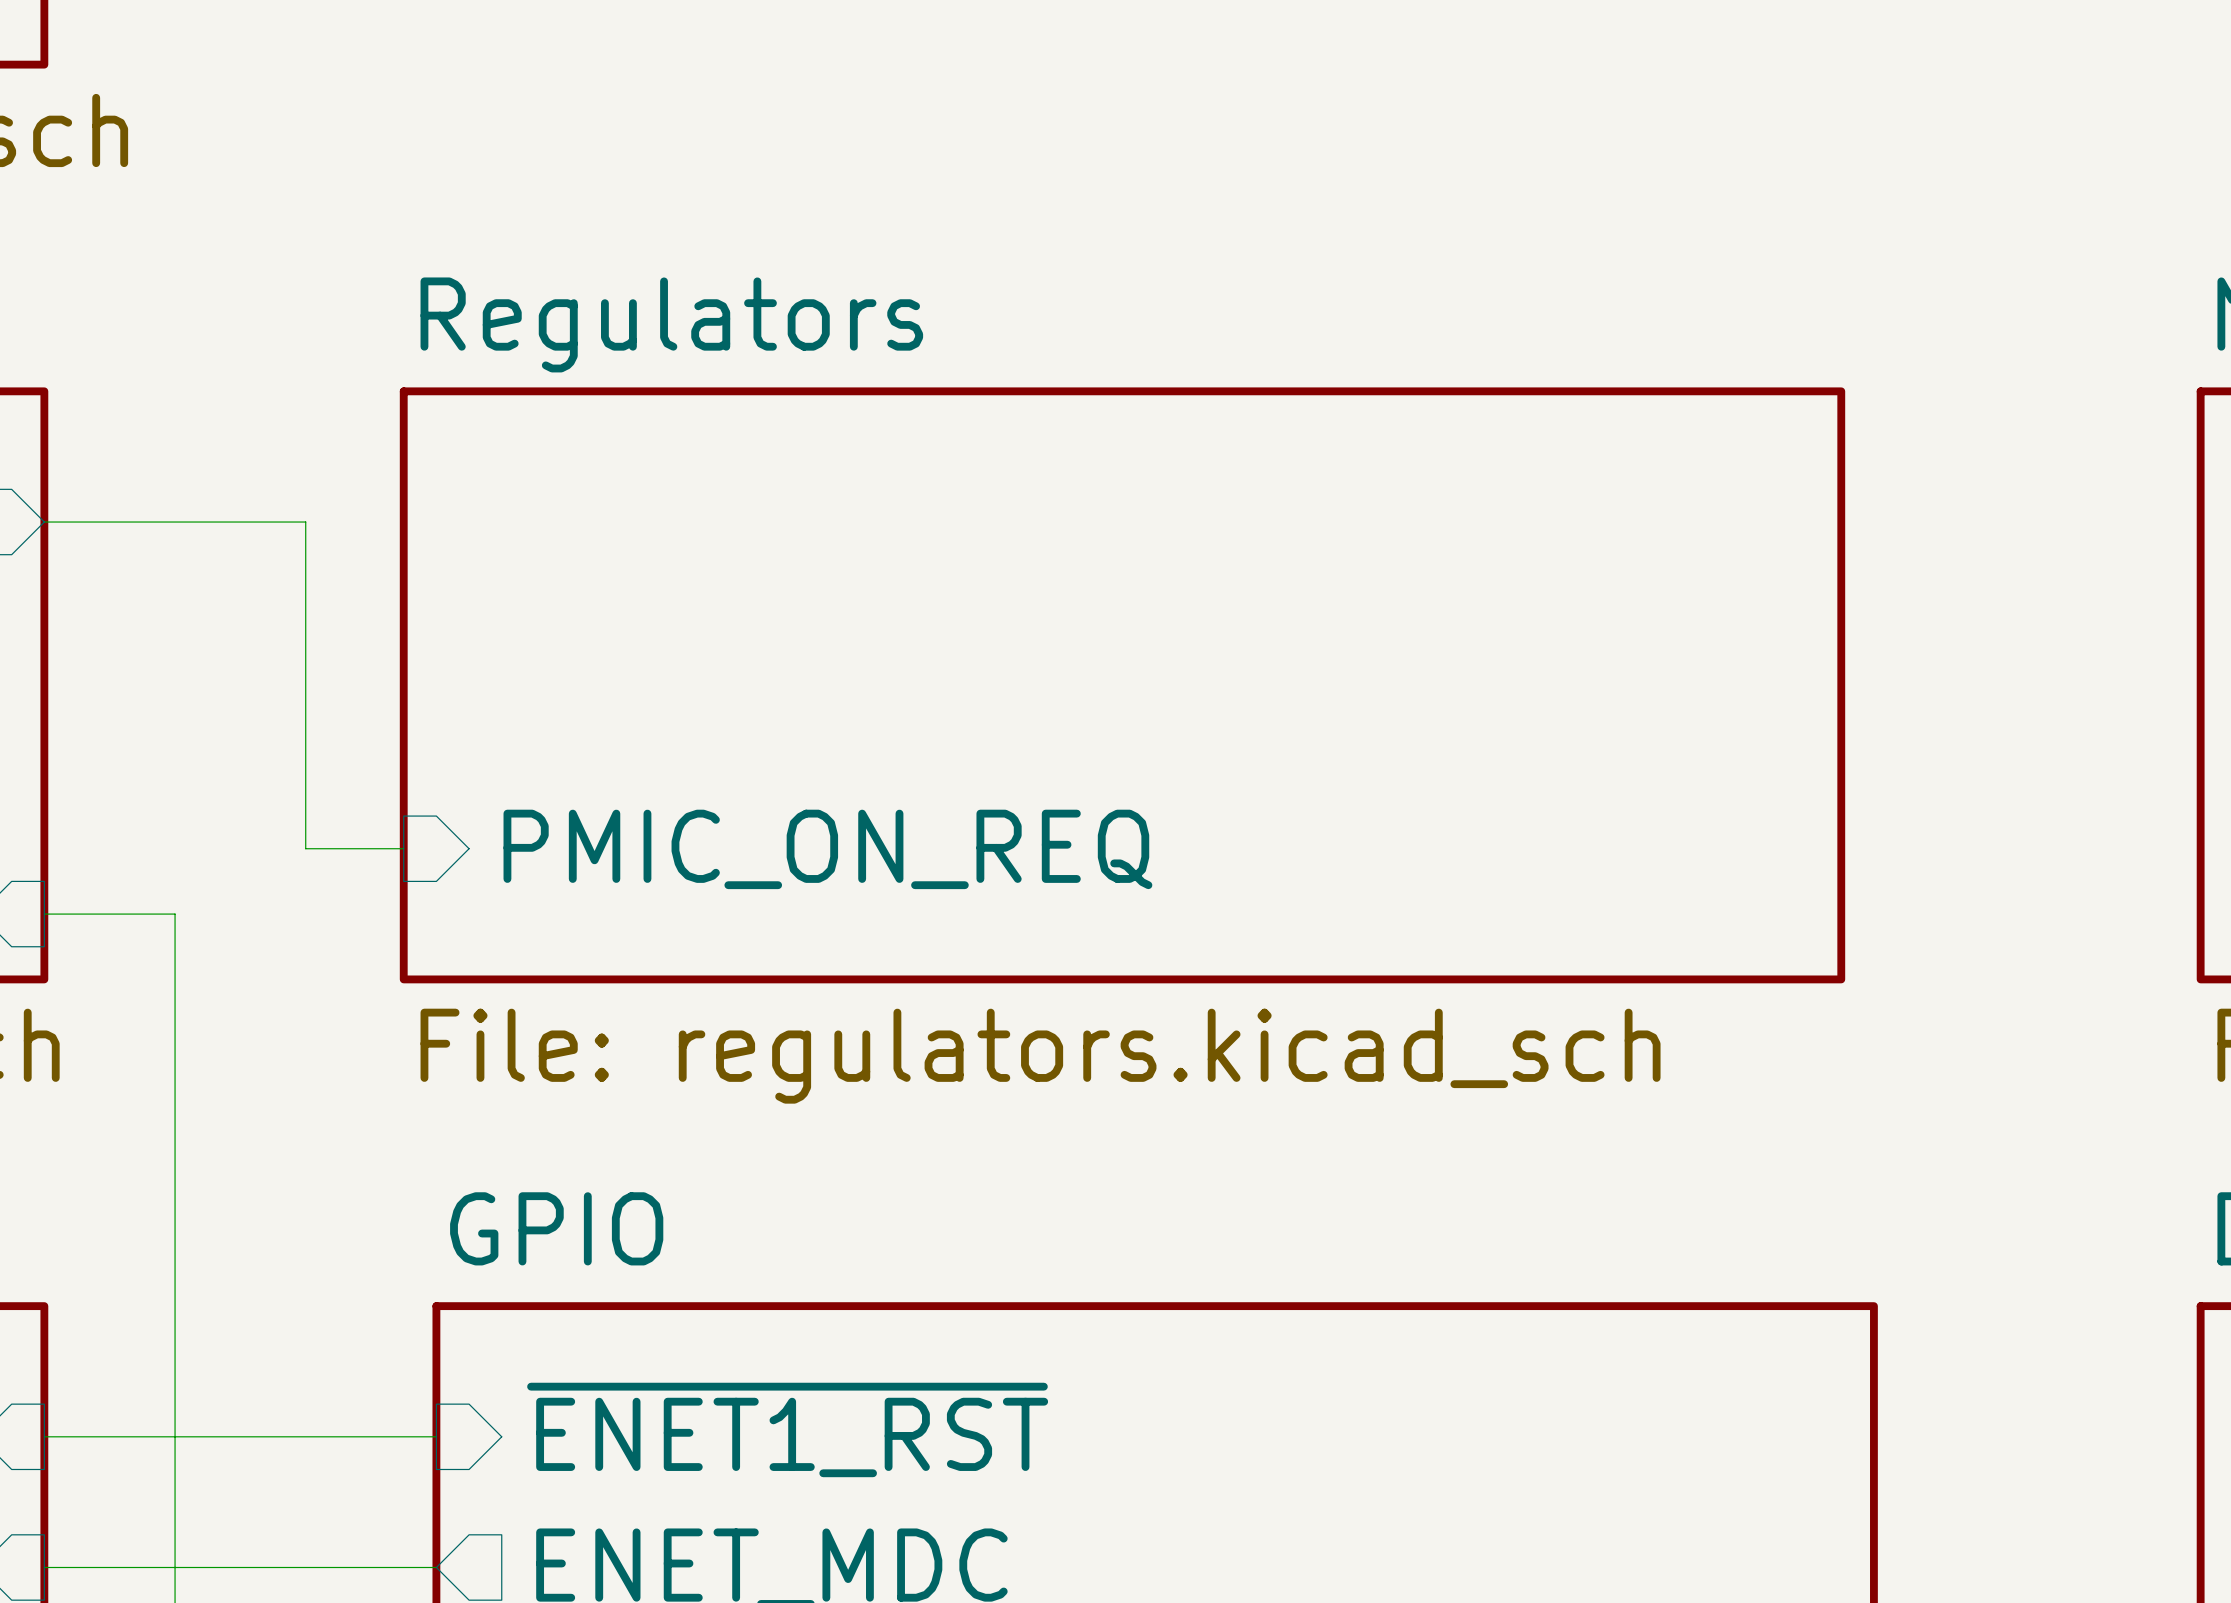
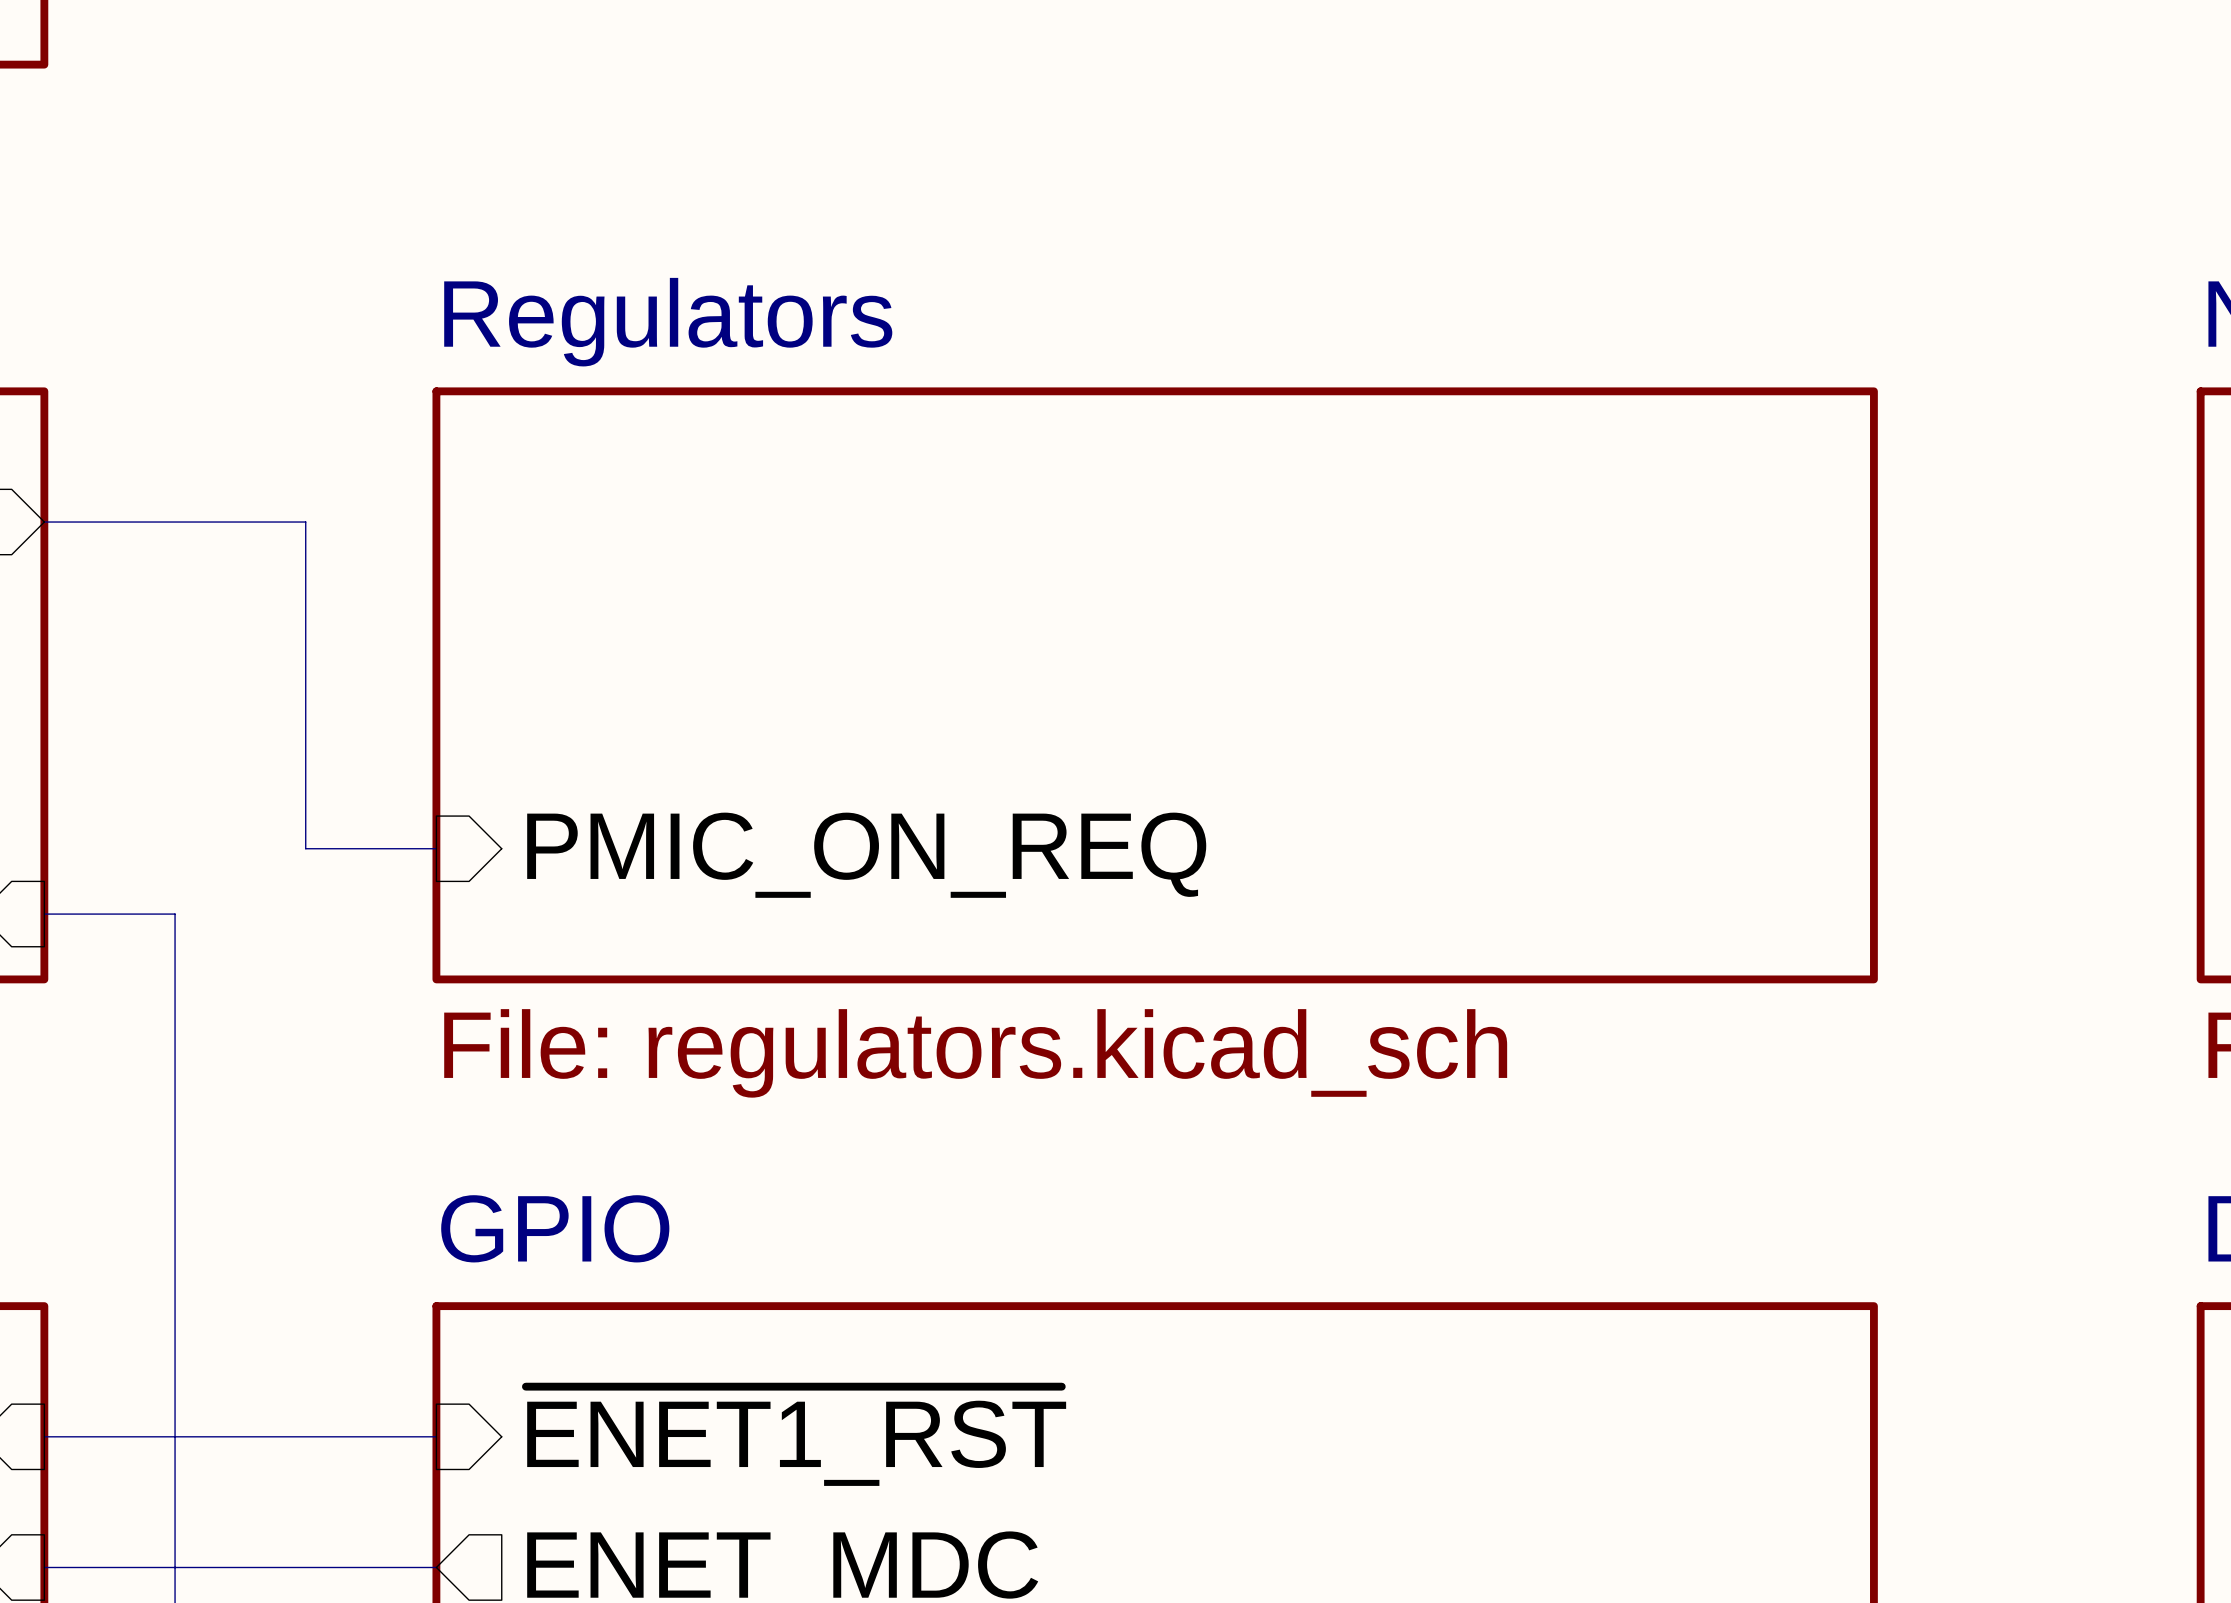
sheet Regulators position: (1122, 685) -> (1155, 685)
wire: none -> (403, 848) (436, 848)
sheet pin position: PMIC_ON_REQ (827, 849) -> PMIC_ON_REQ (866, 855)

